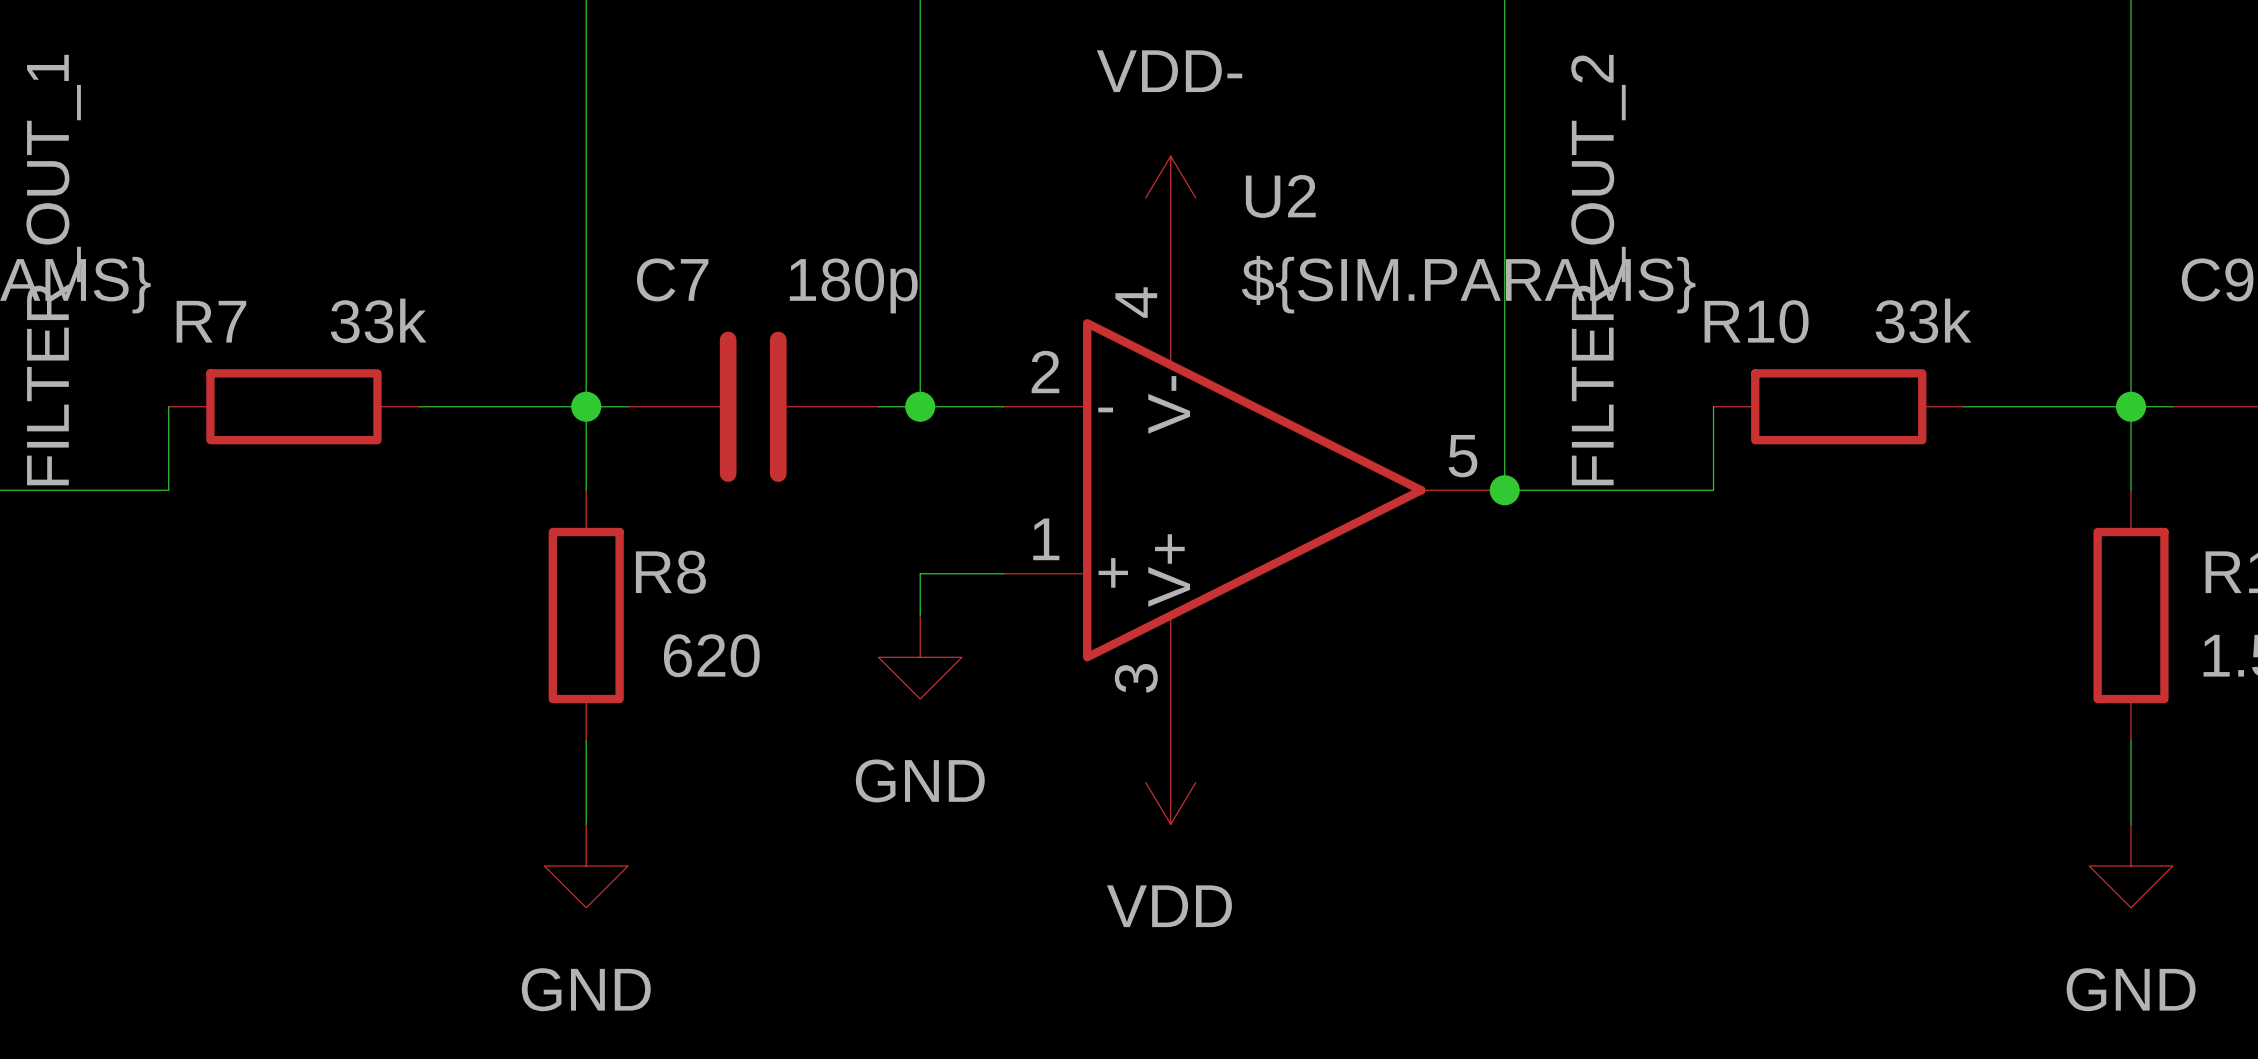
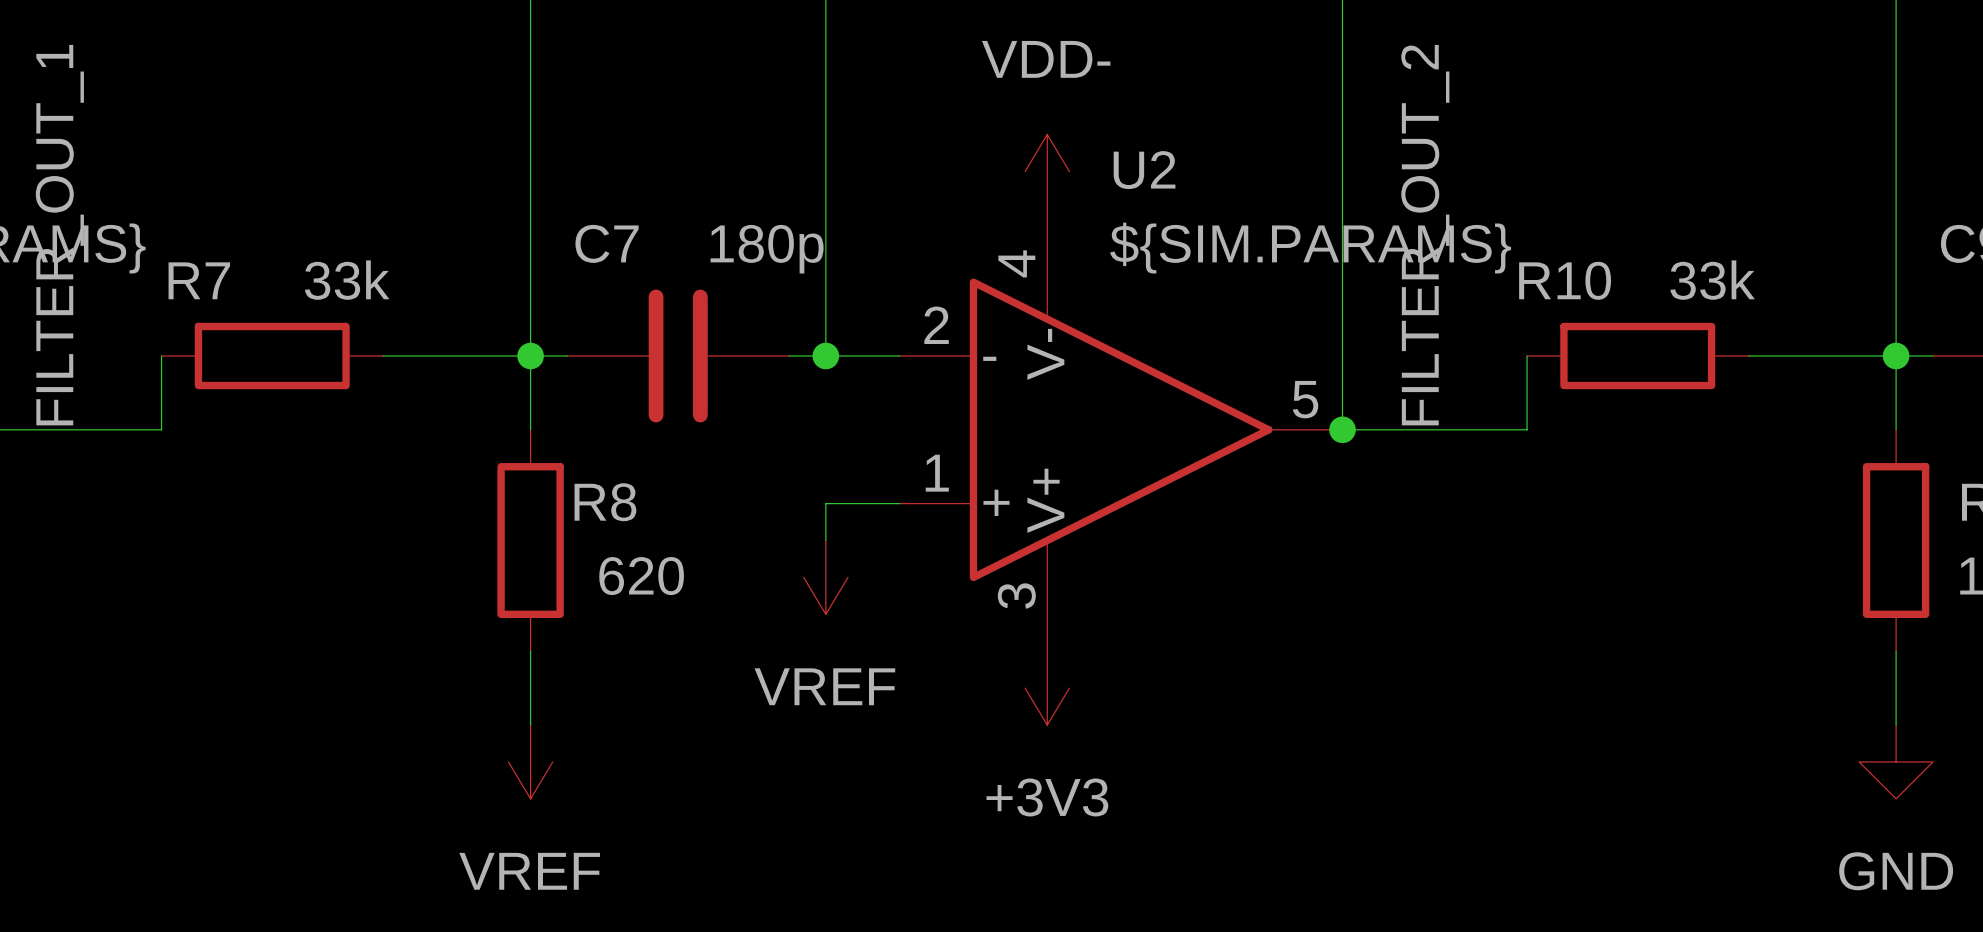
power symbol: GND (920, 657) -> VREF (825, 577)
power symbol: VDD (1170, 782) -> +3V3 (1047, 688)
power symbol: GND (586, 866) -> VREF (530, 761)

